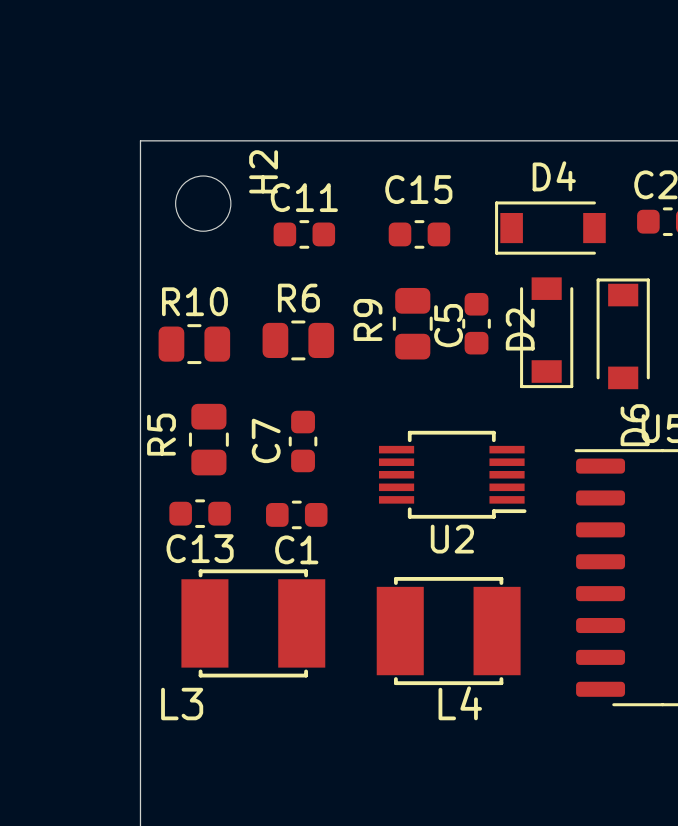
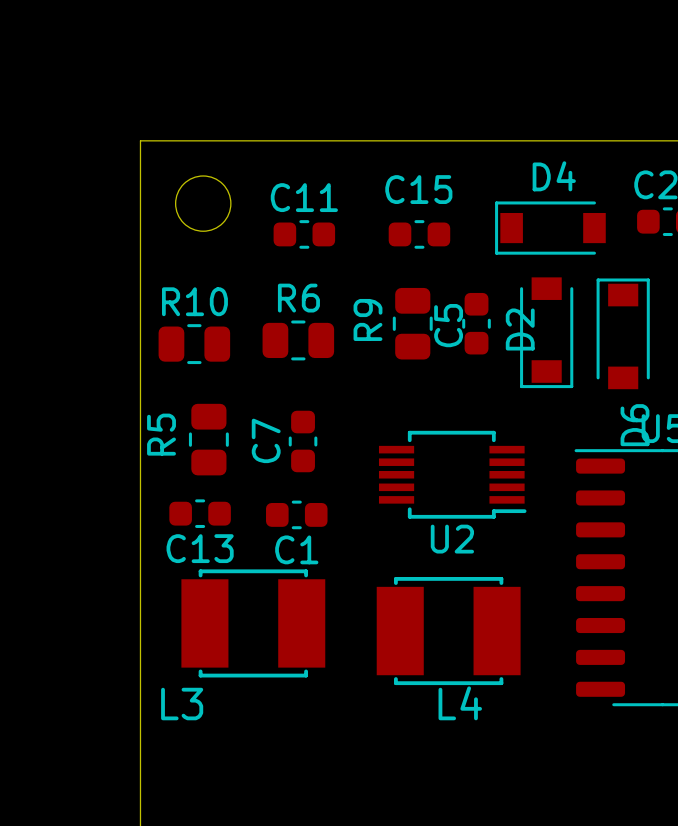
H2 name: H2 (263, 171) -> none

